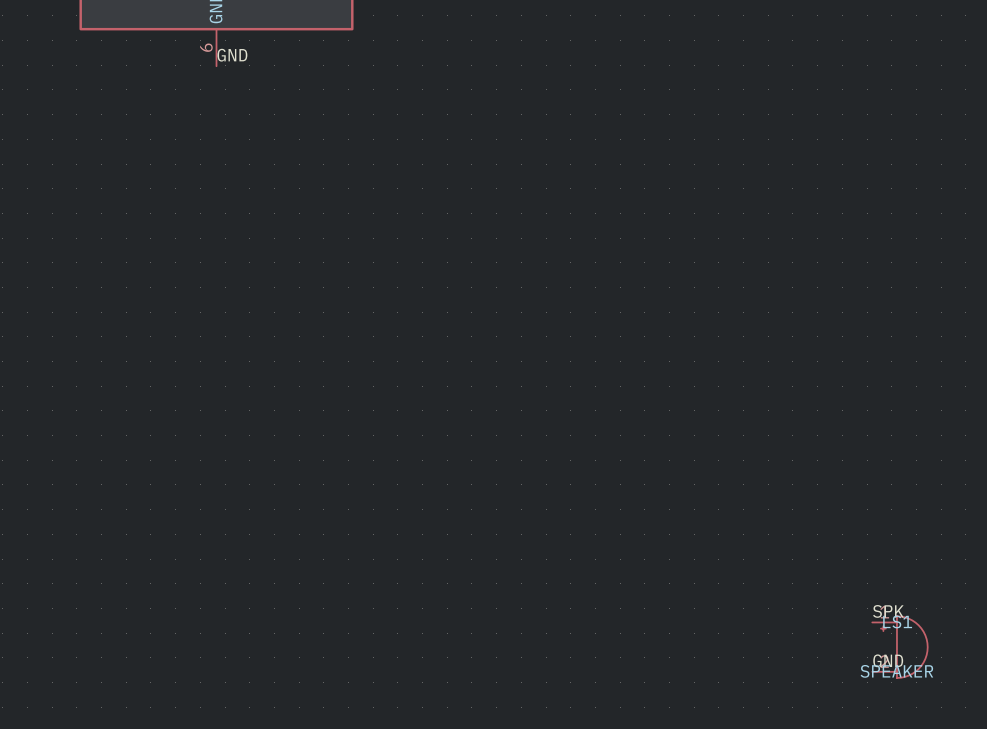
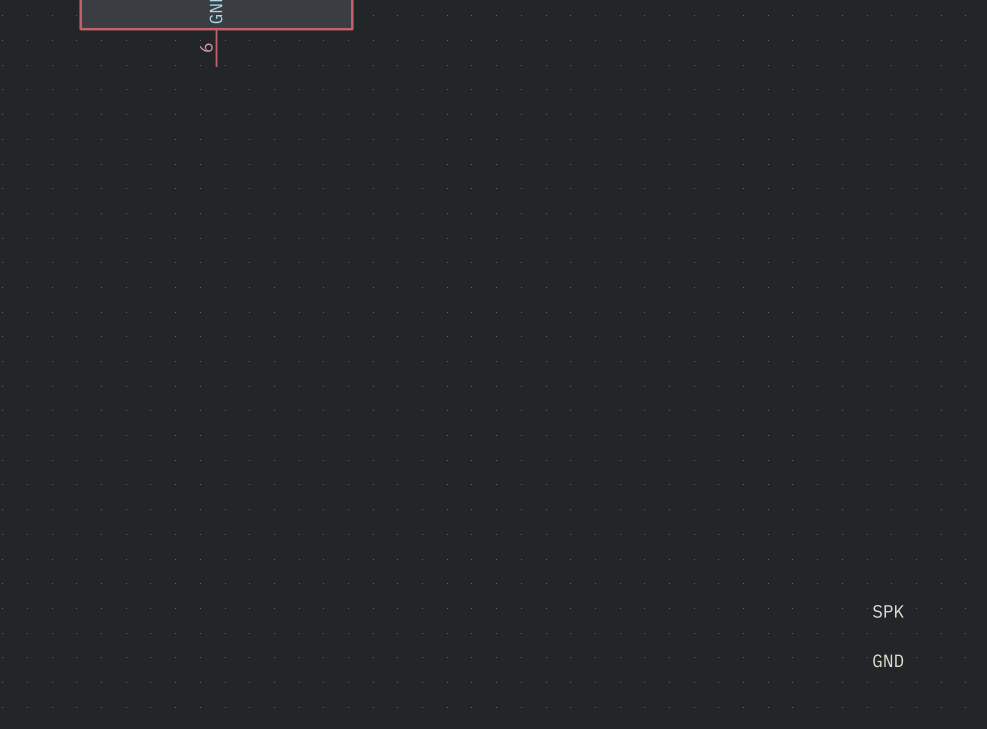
label: GND (232, 55) -> none
LS1: SPEAKER (899, 647) -> none

